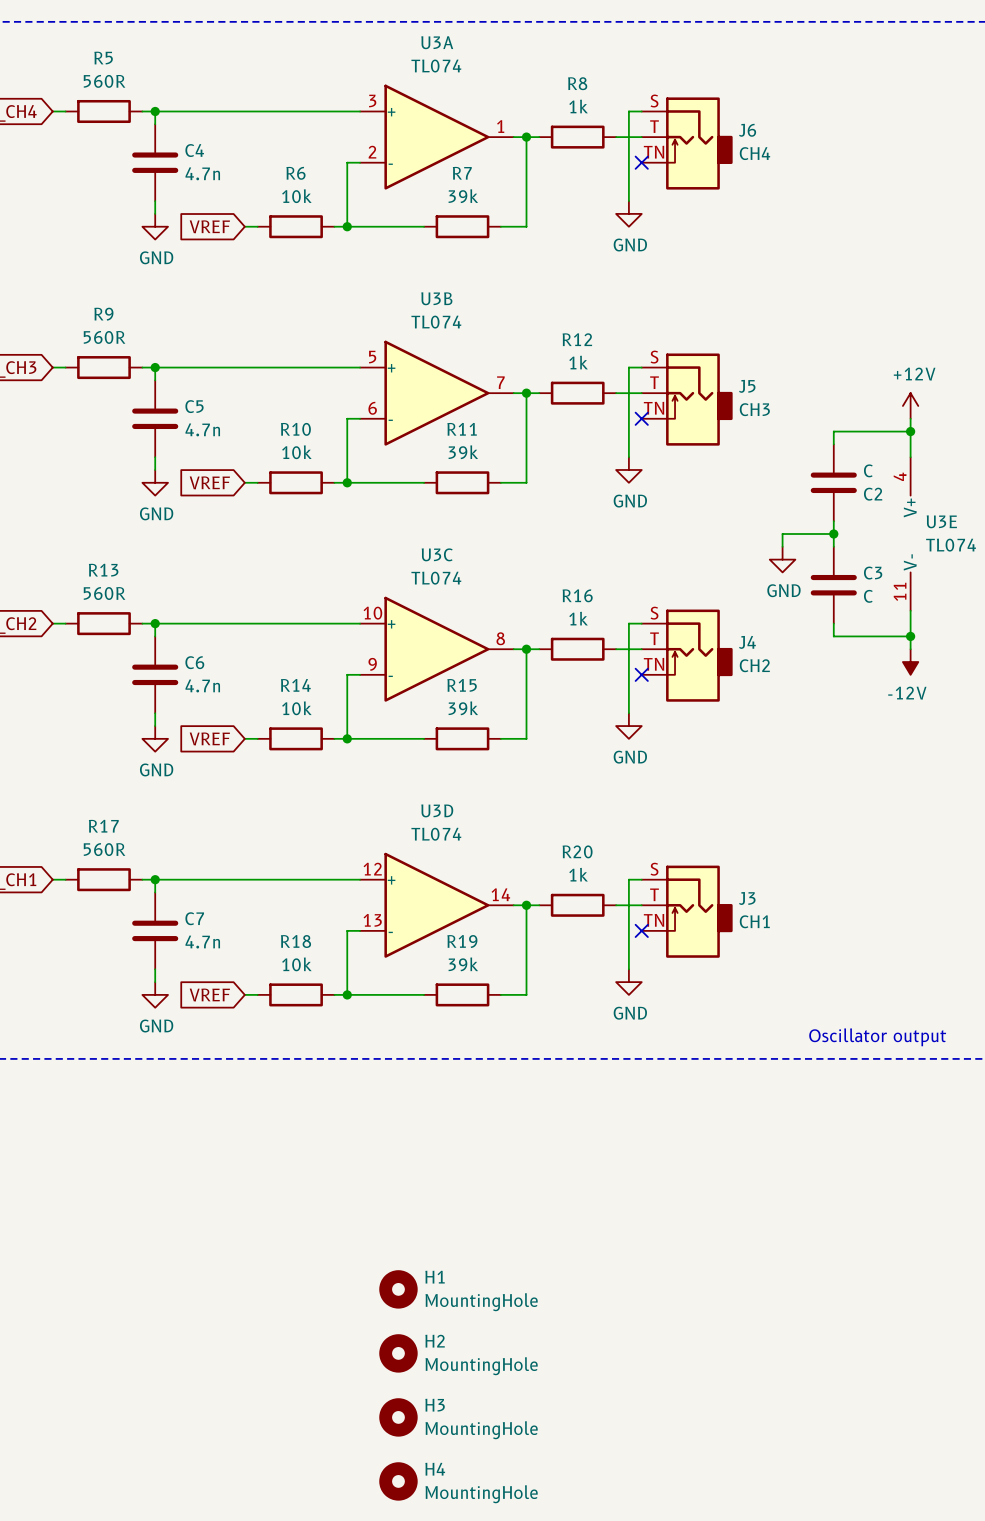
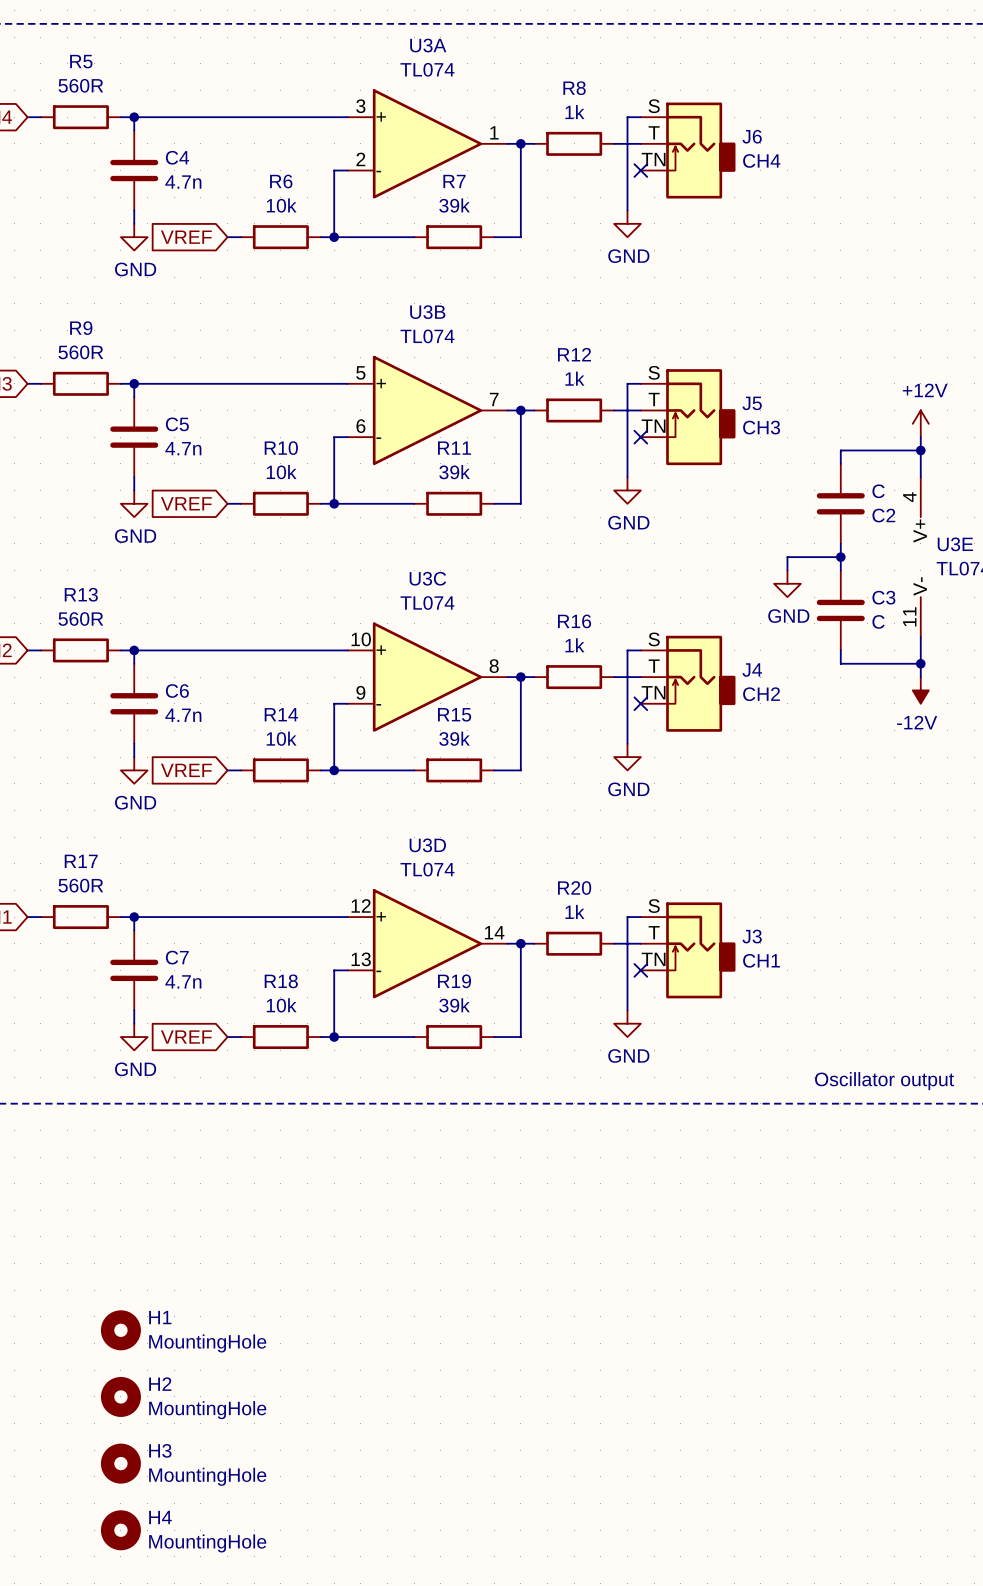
H1 position: (398, 1289) -> (120, 1330)
H2 position: (398, 1353) -> (120, 1396)
H3 position: (398, 1417) -> (120, 1463)
H4 position: (398, 1481) -> (120, 1530)

